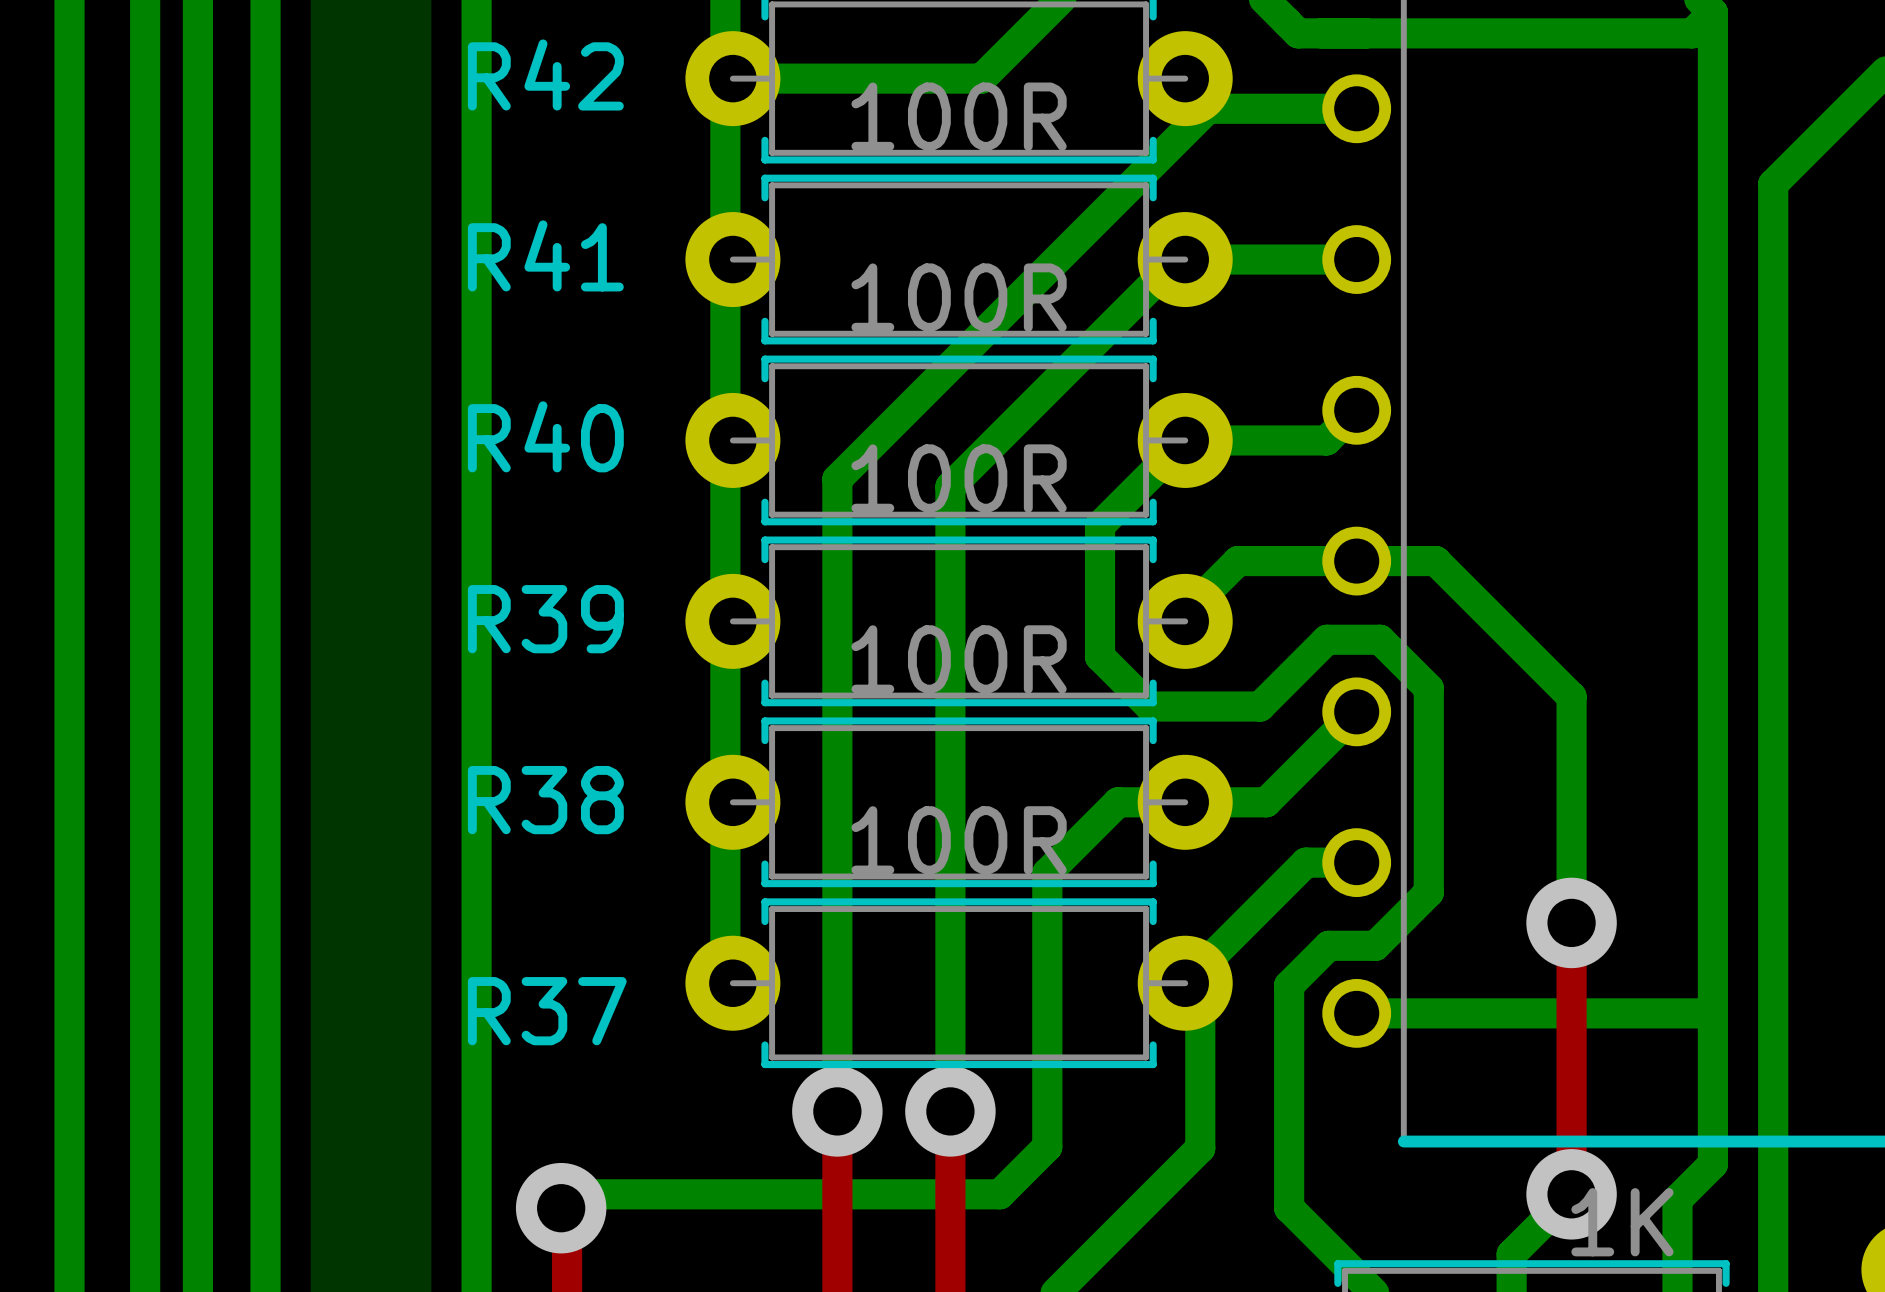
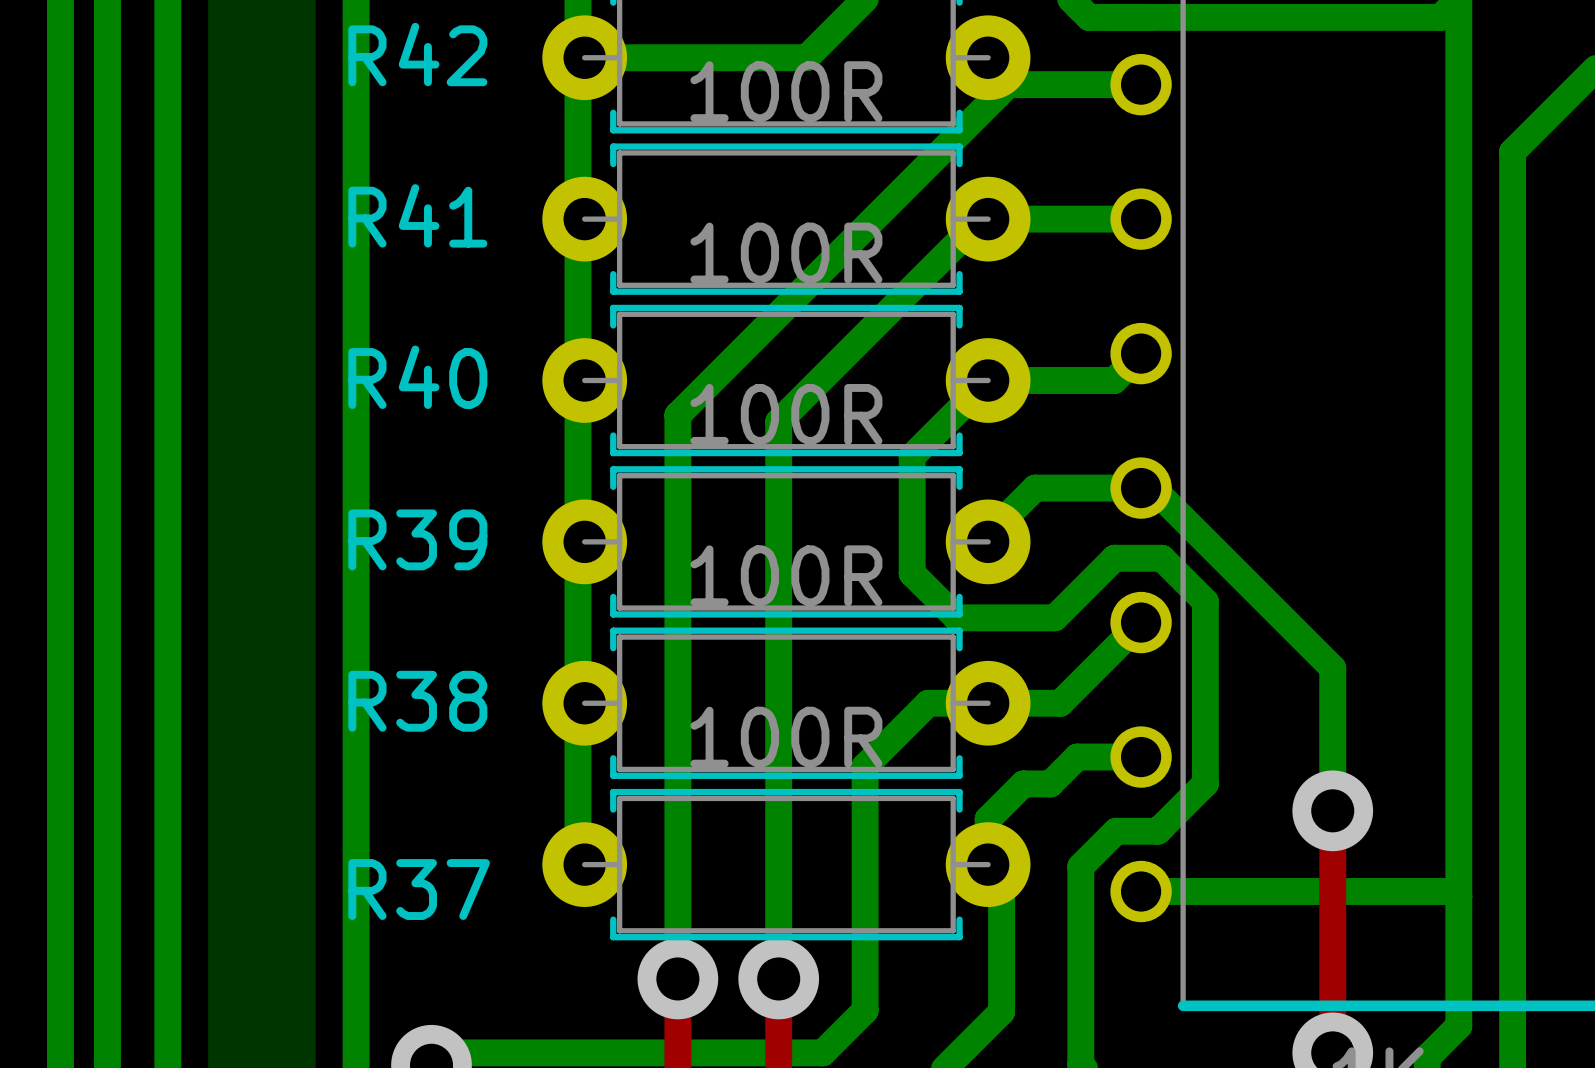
bottom track: (1369, 561) (1435, 561) (1571, 696) (1571, 762) -> (1152, 488) (1332, 668)
bottom track: (1305, 862) (1185, 983) -> (1095, 757) (1077, 757) (1050, 783) (1023, 783) (988, 819) (988, 864)

